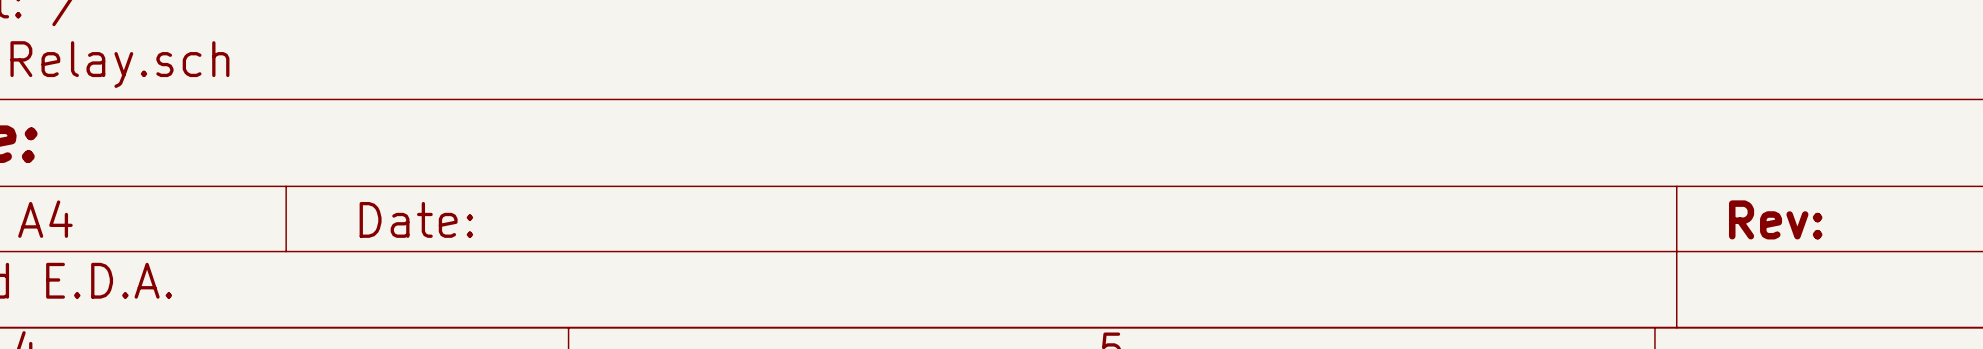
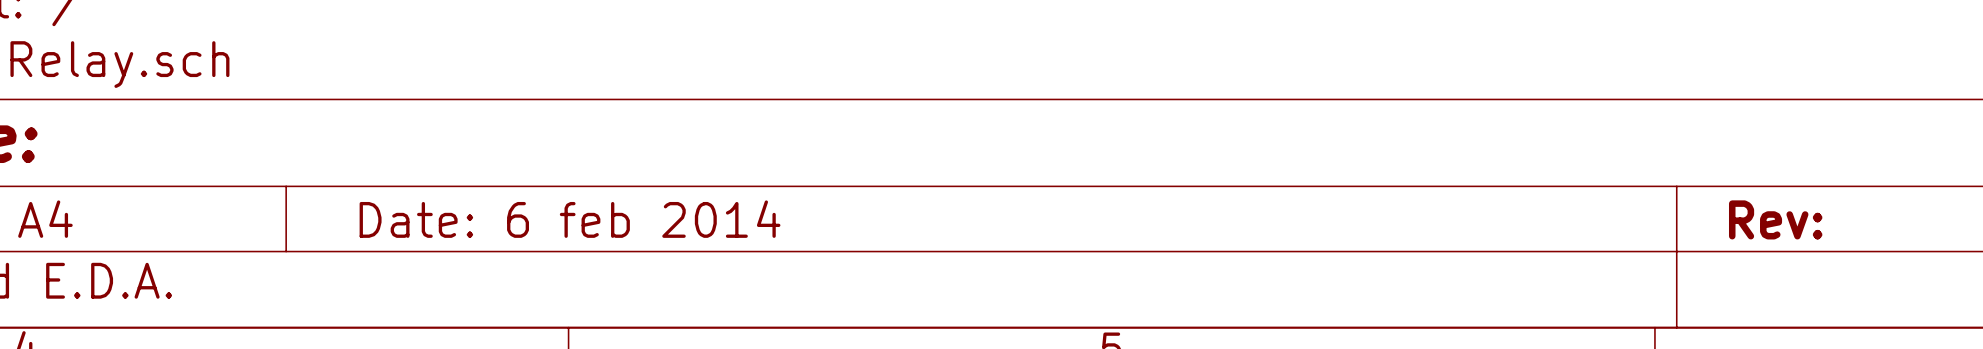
title block: Date: (416, 219) -> Date: 6 feb 2014 (570, 219)

